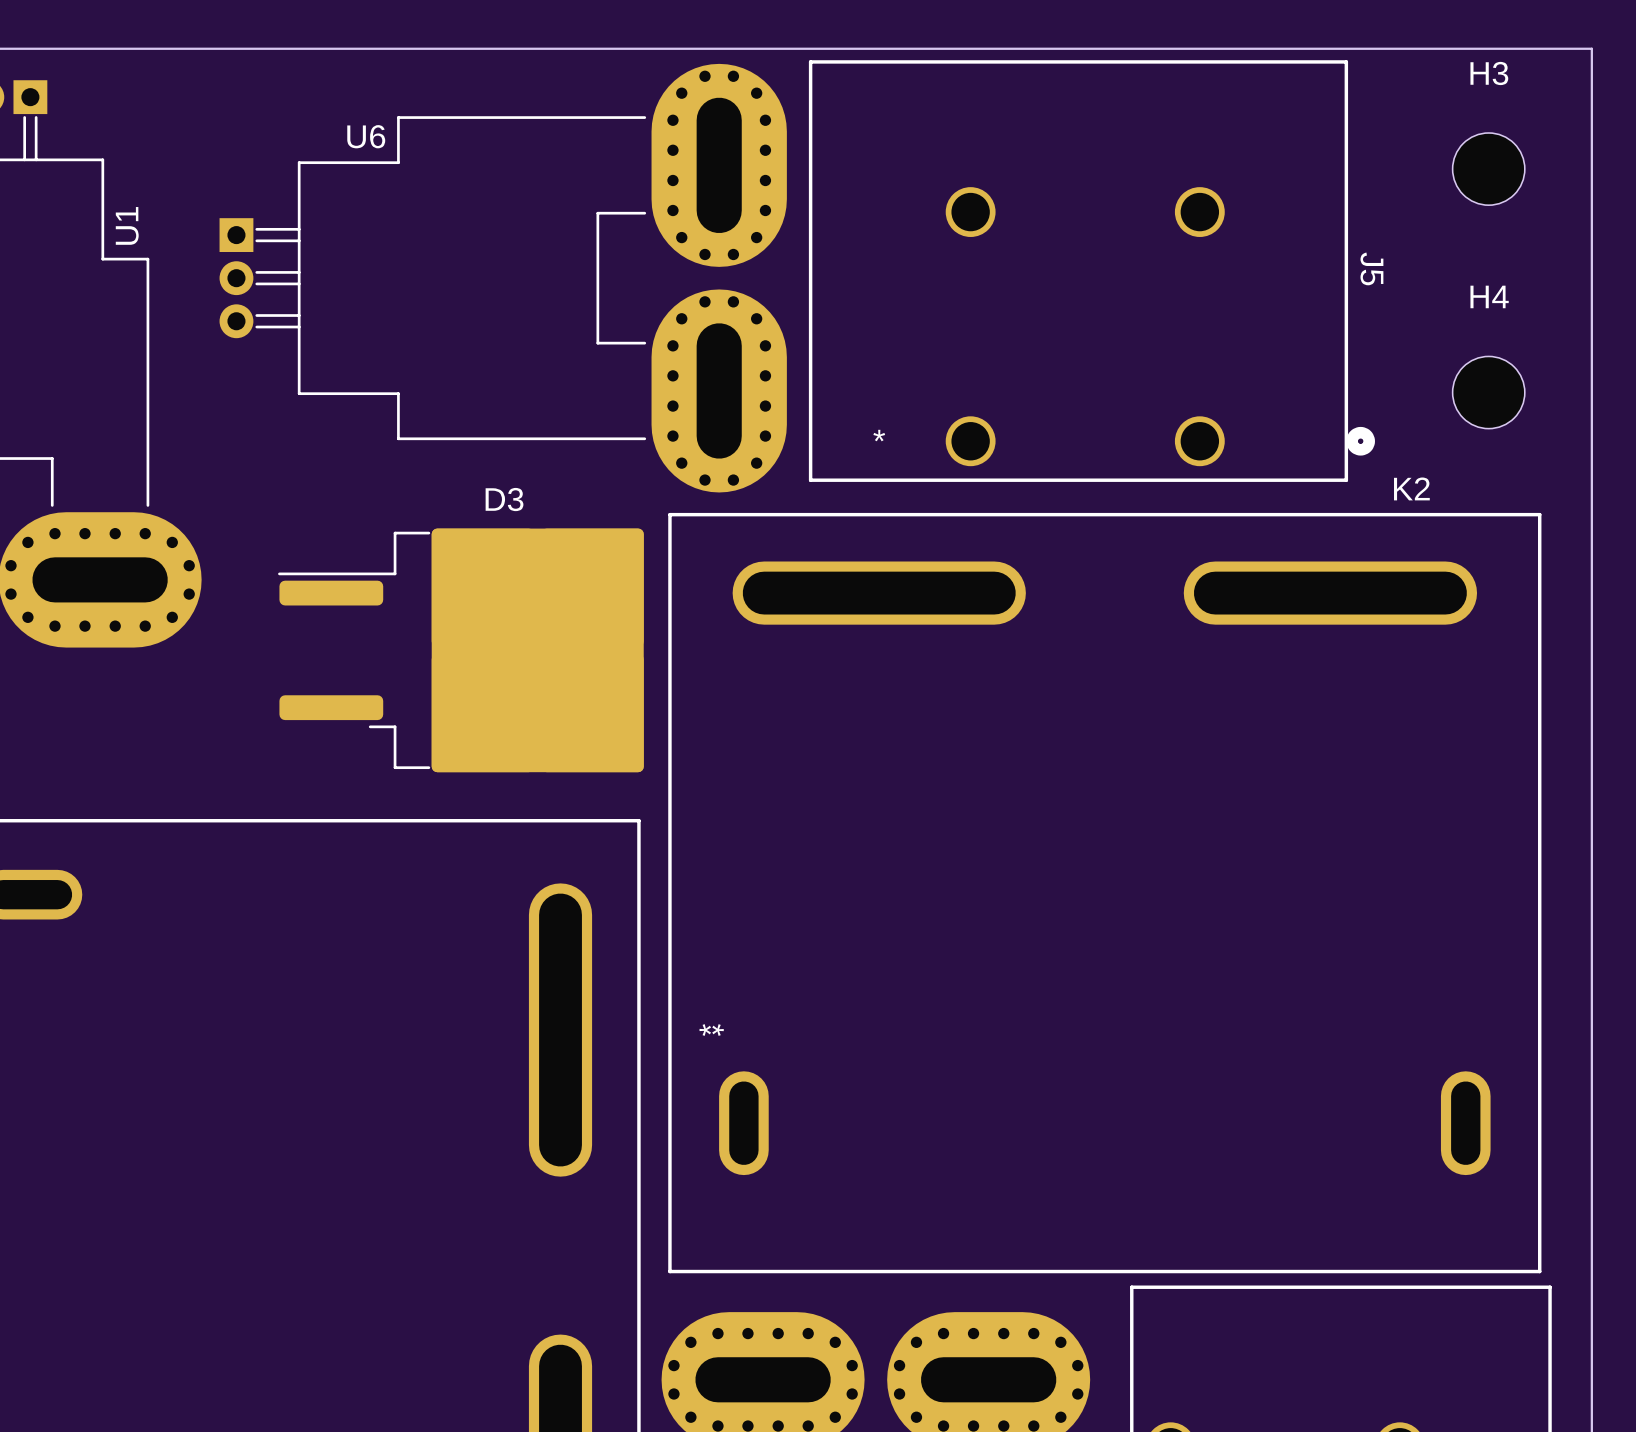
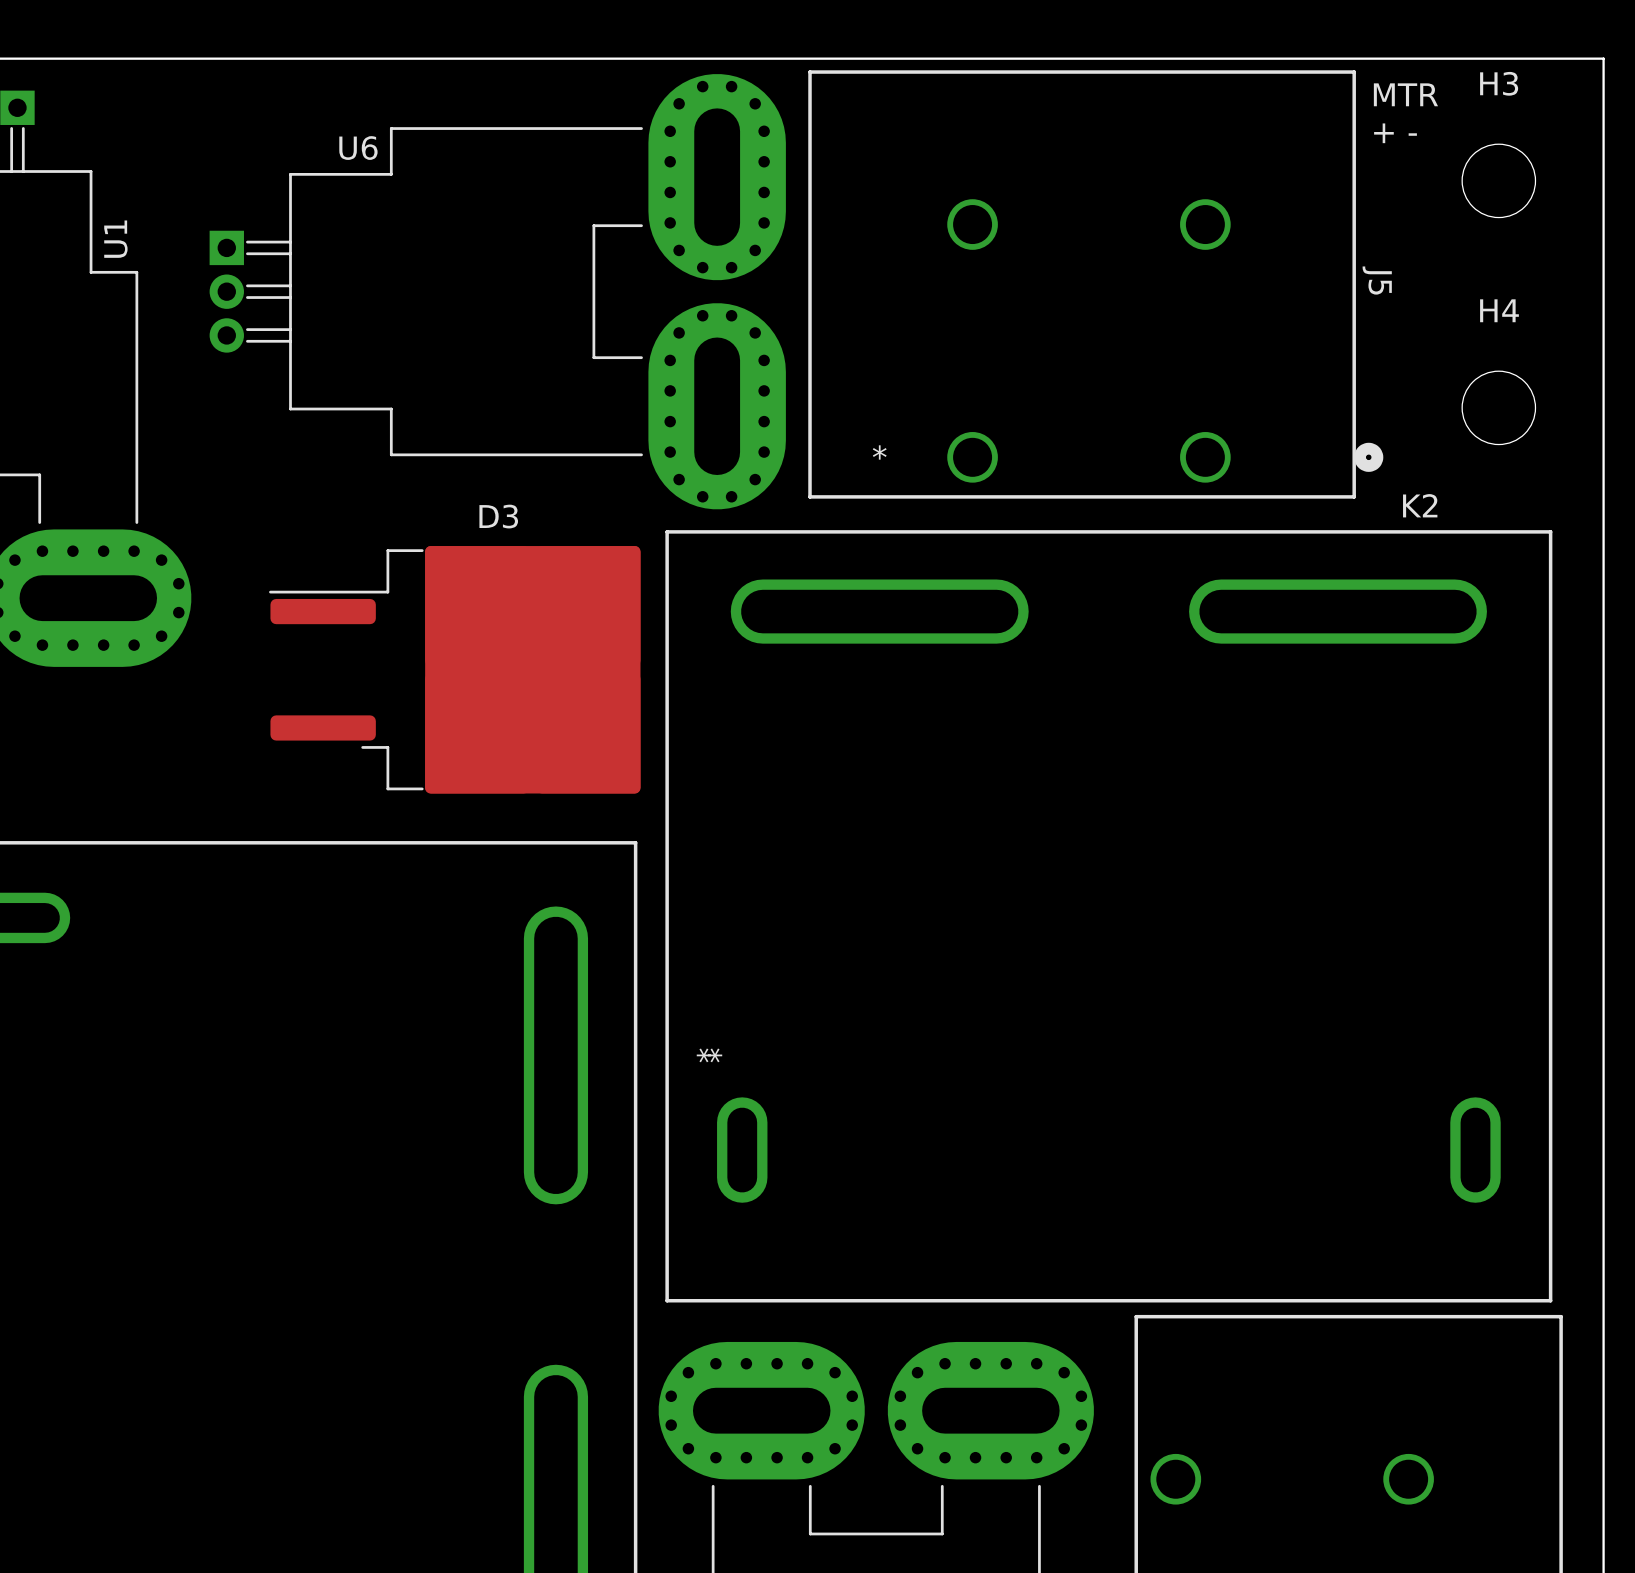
text: none -> MTR (1405, 94)
text: none -> + - (1395, 133)

